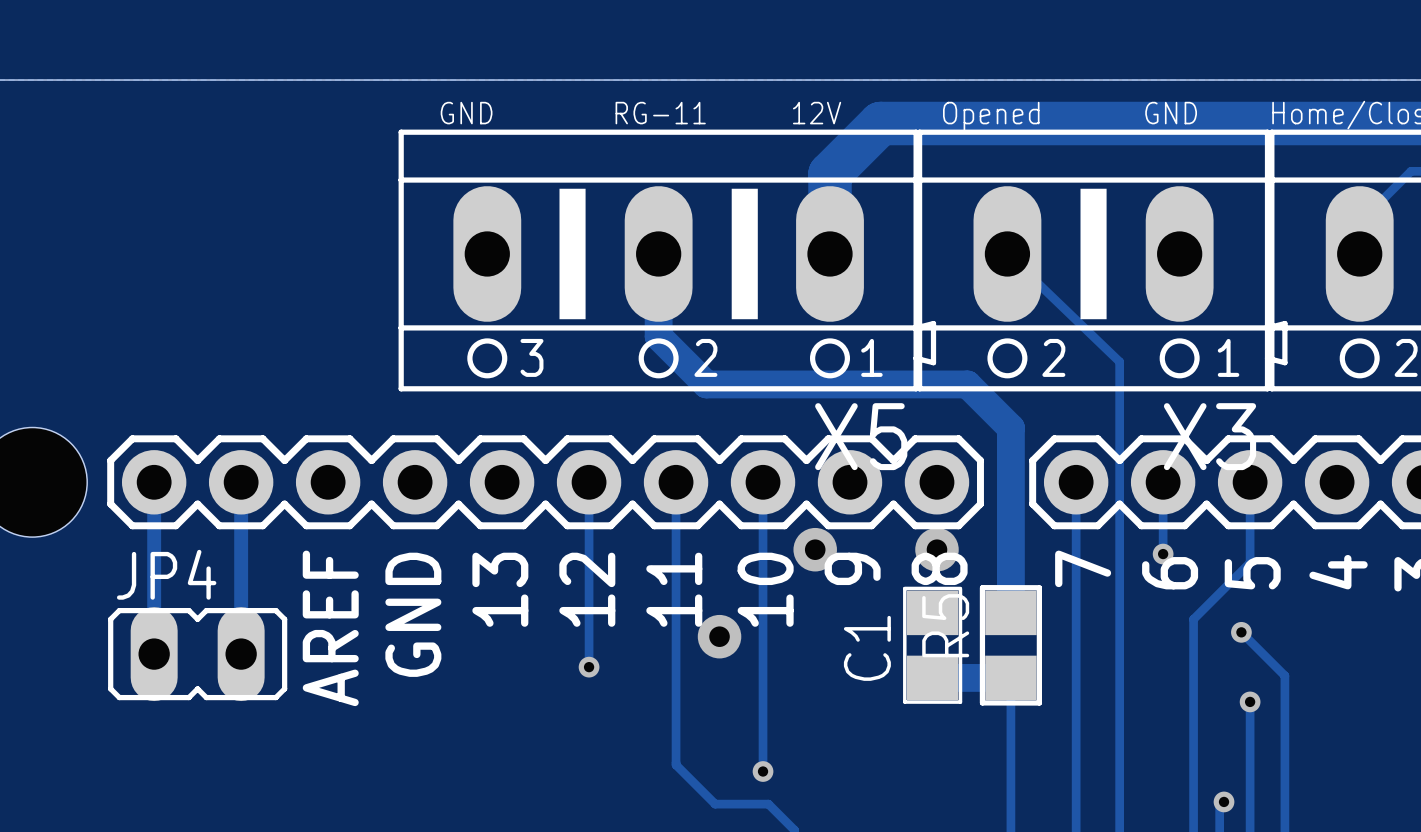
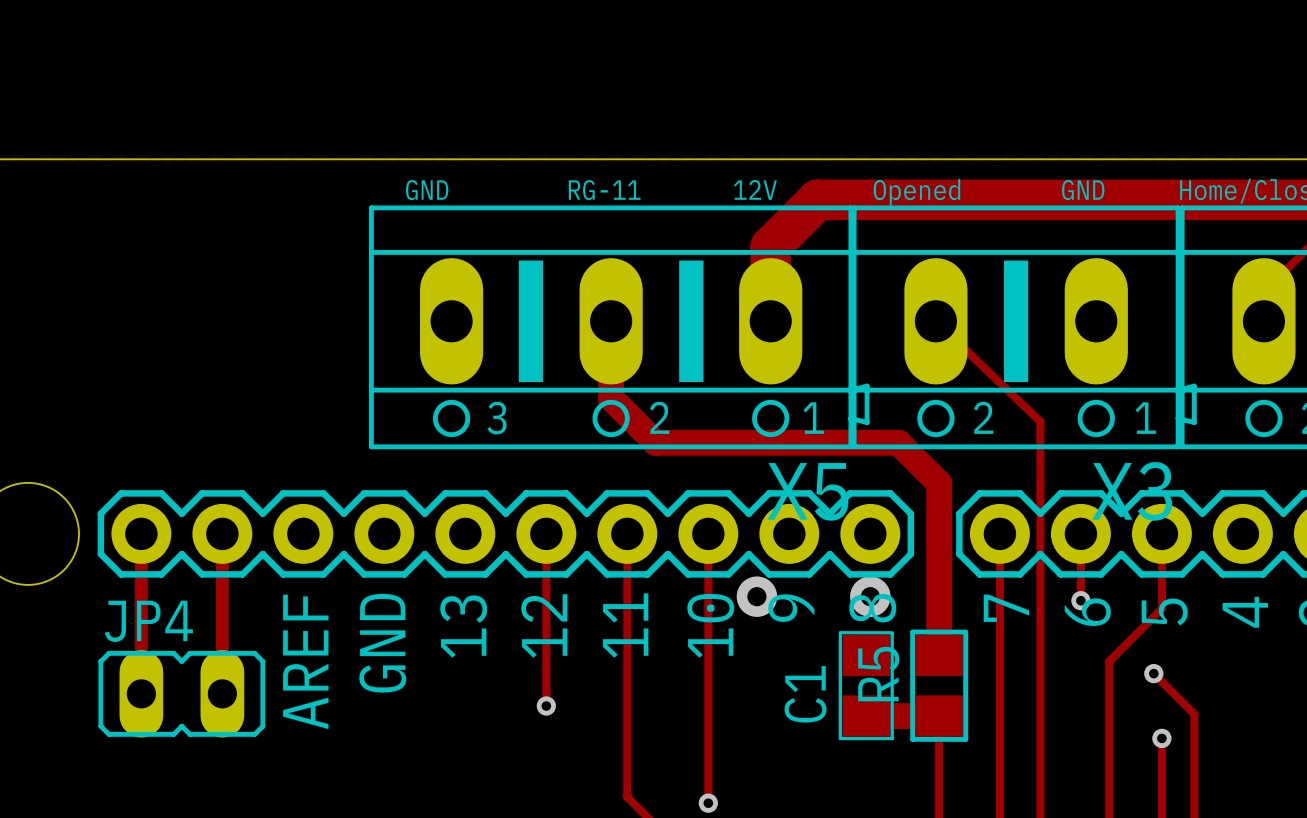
via: (719, 636) -> none

